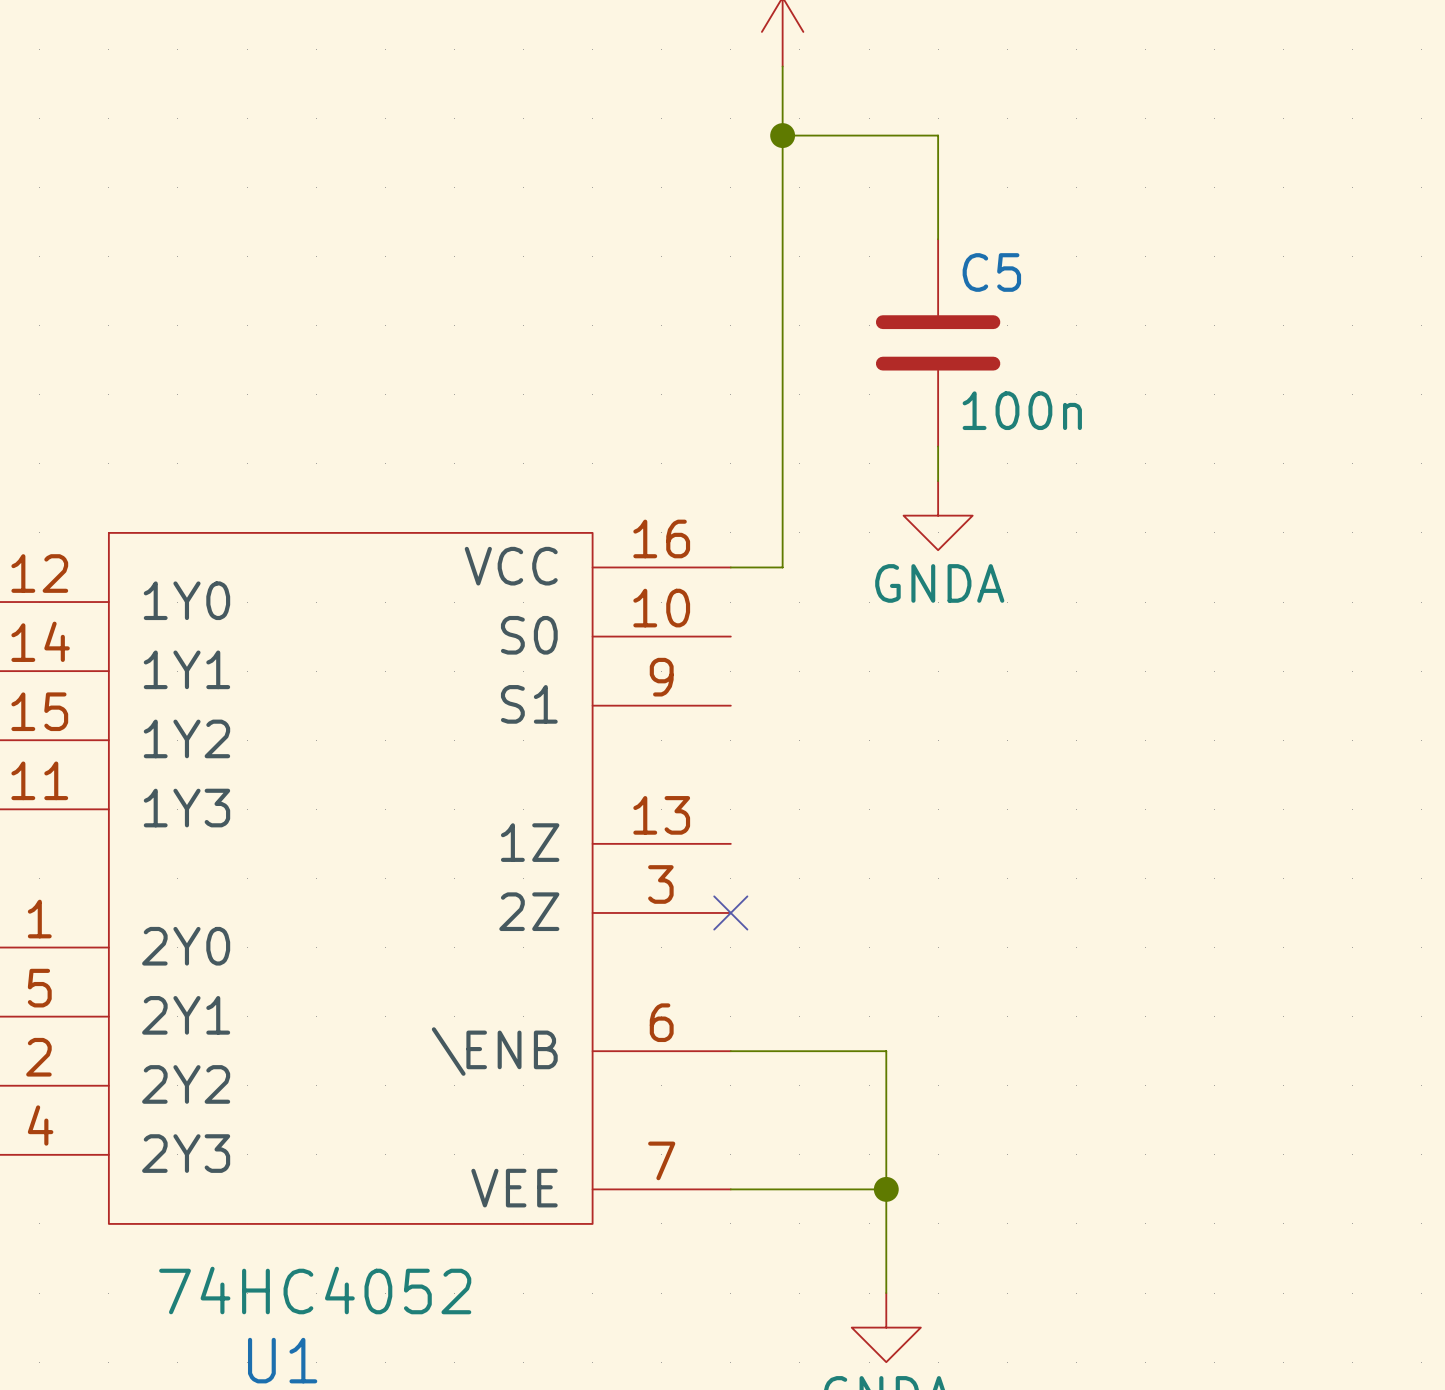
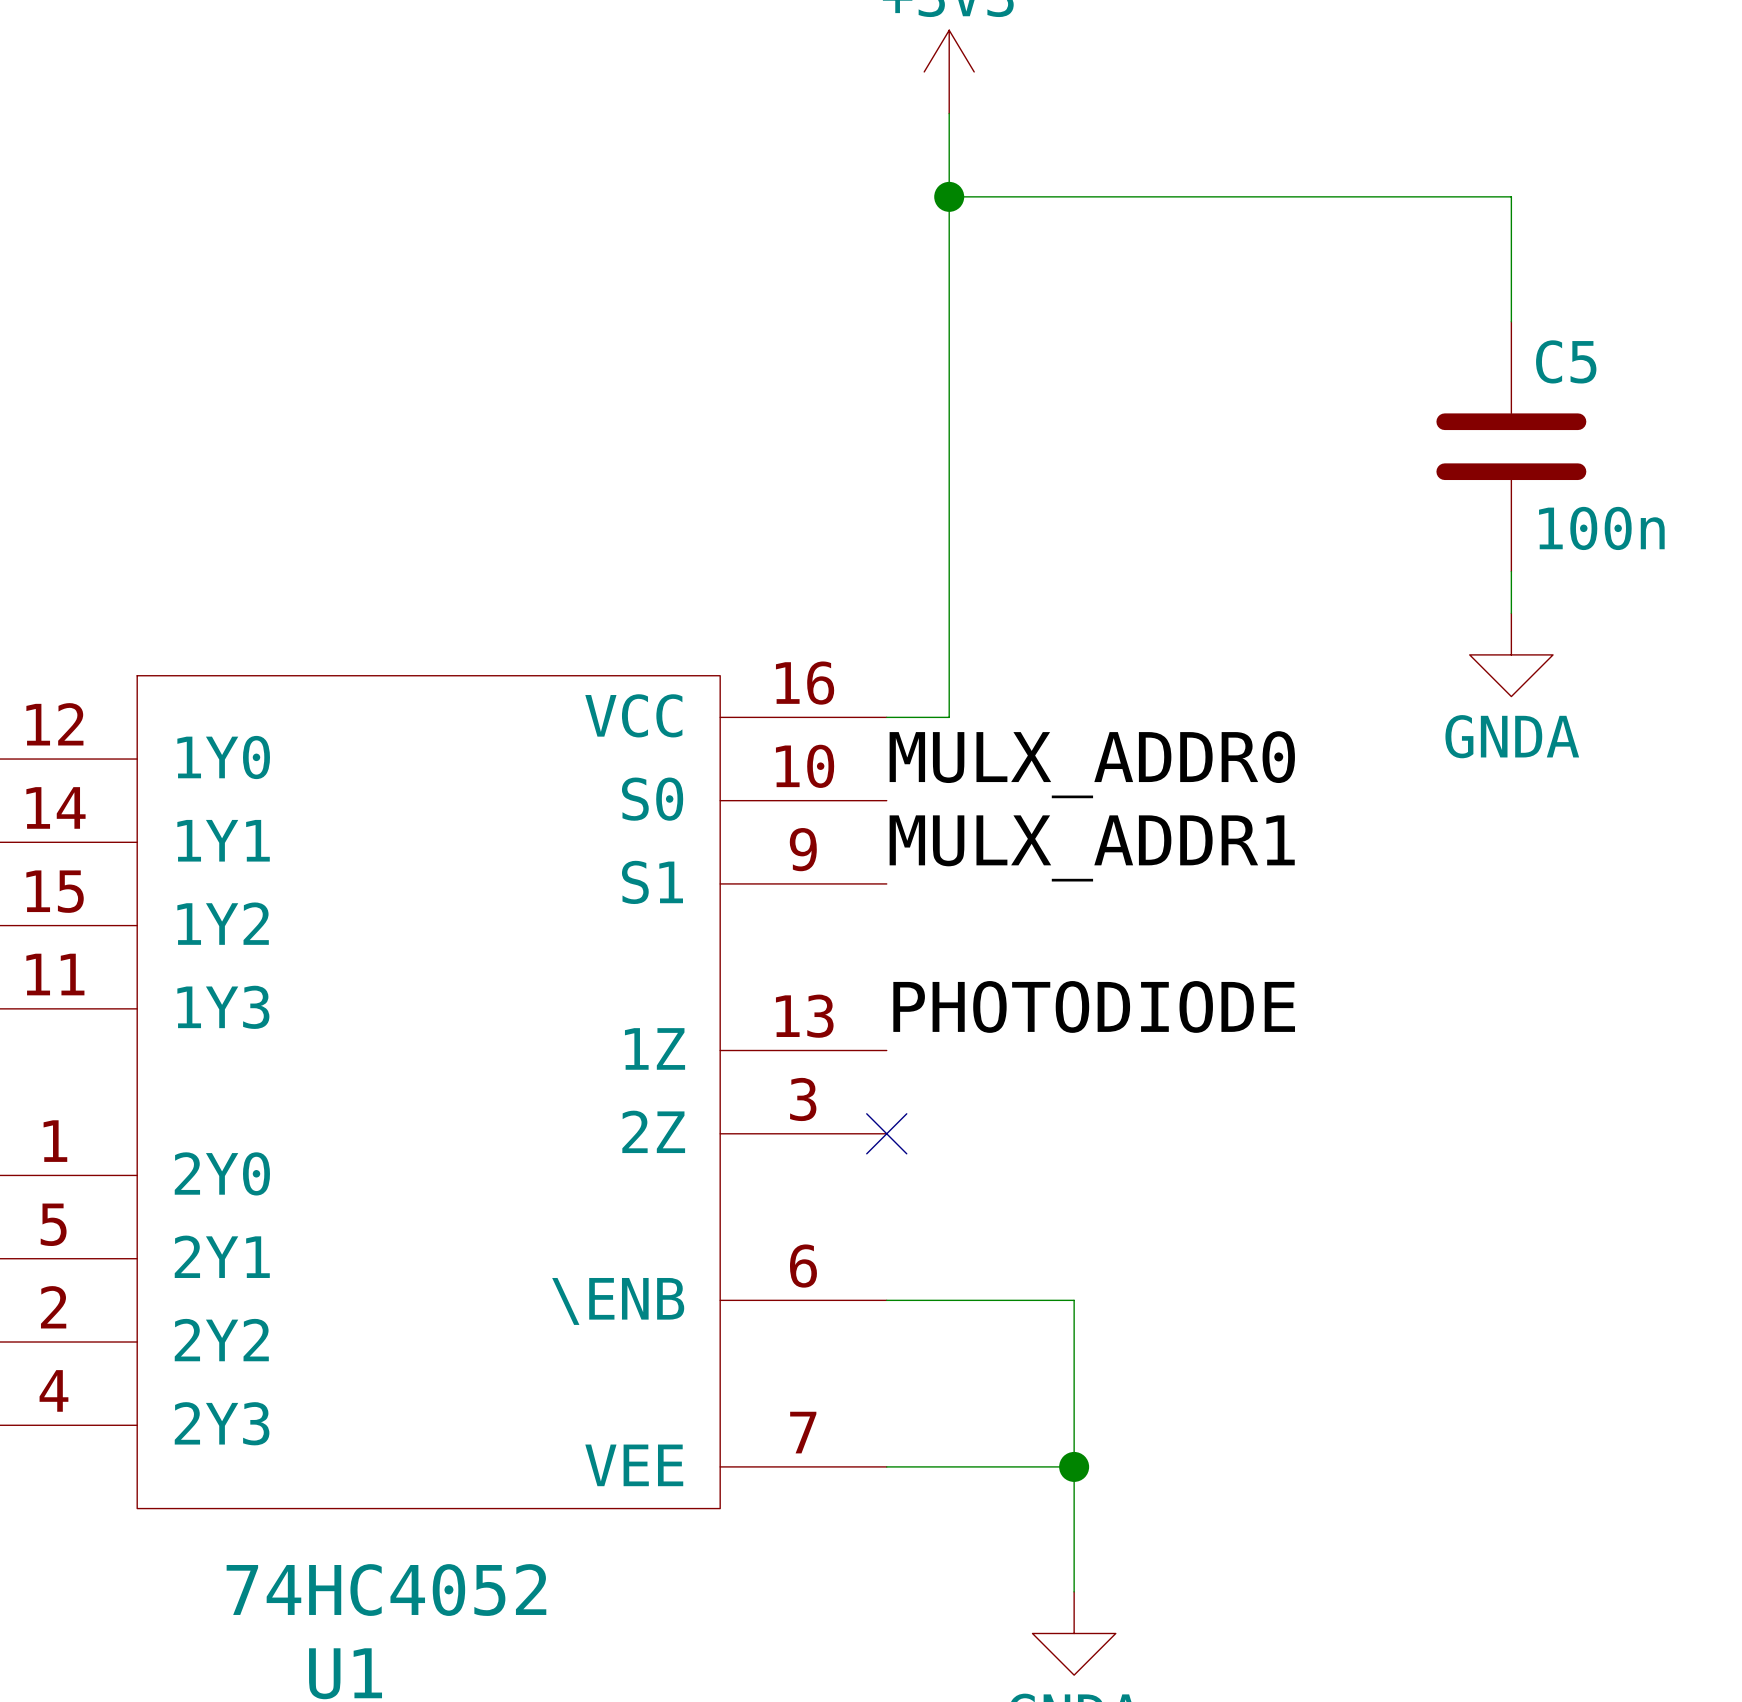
wire: (938, 135) (938, 239) -> (1136, 196) (1511, 196) (1511, 321)
C5 position: (938, 342) -> (1511, 446)
wire: (938, 446) (938, 481) -> (1511, 571) (1511, 613)
power symbol position: GNDA (938, 515) -> GNDA (1511, 654)
label: none -> MULX_ADDR0 (1092, 764)
label: none -> MULX_ADDR1 (1092, 848)
label: none -> PHOTODIODE (1094, 1006)

